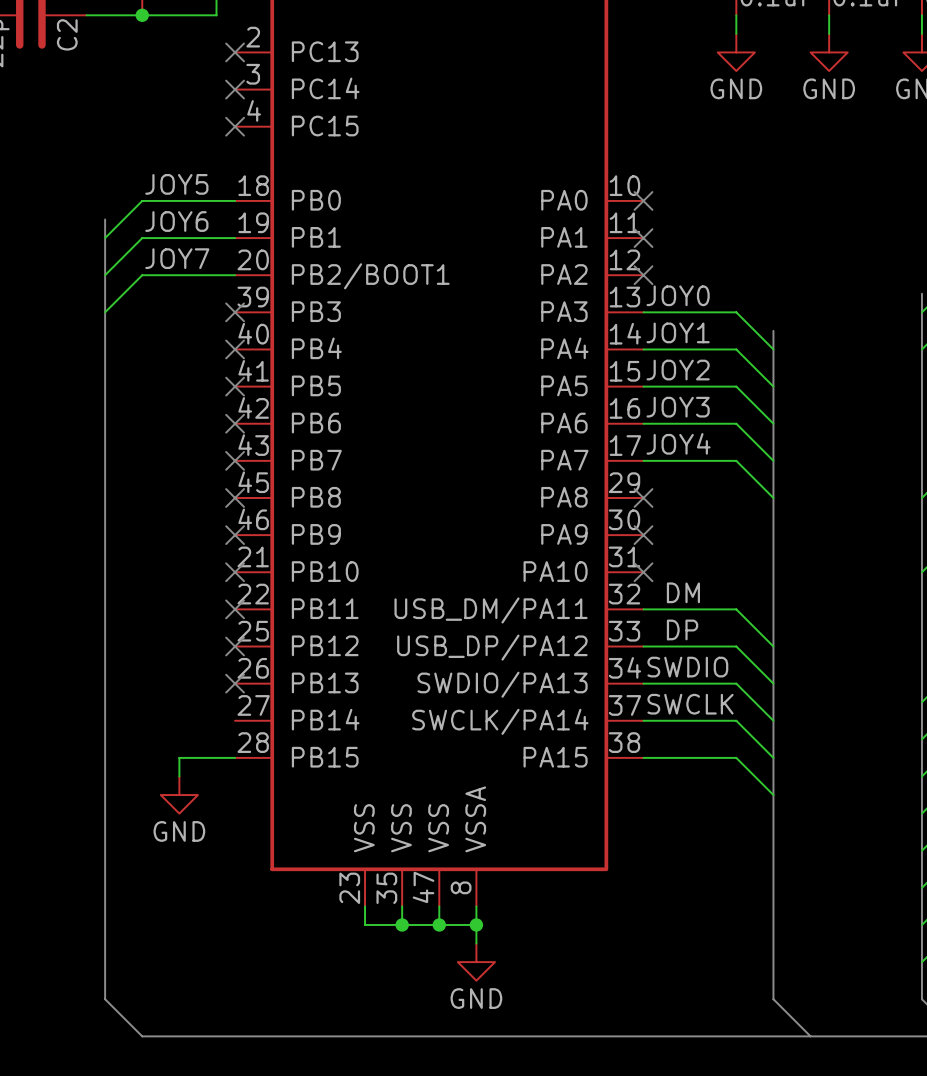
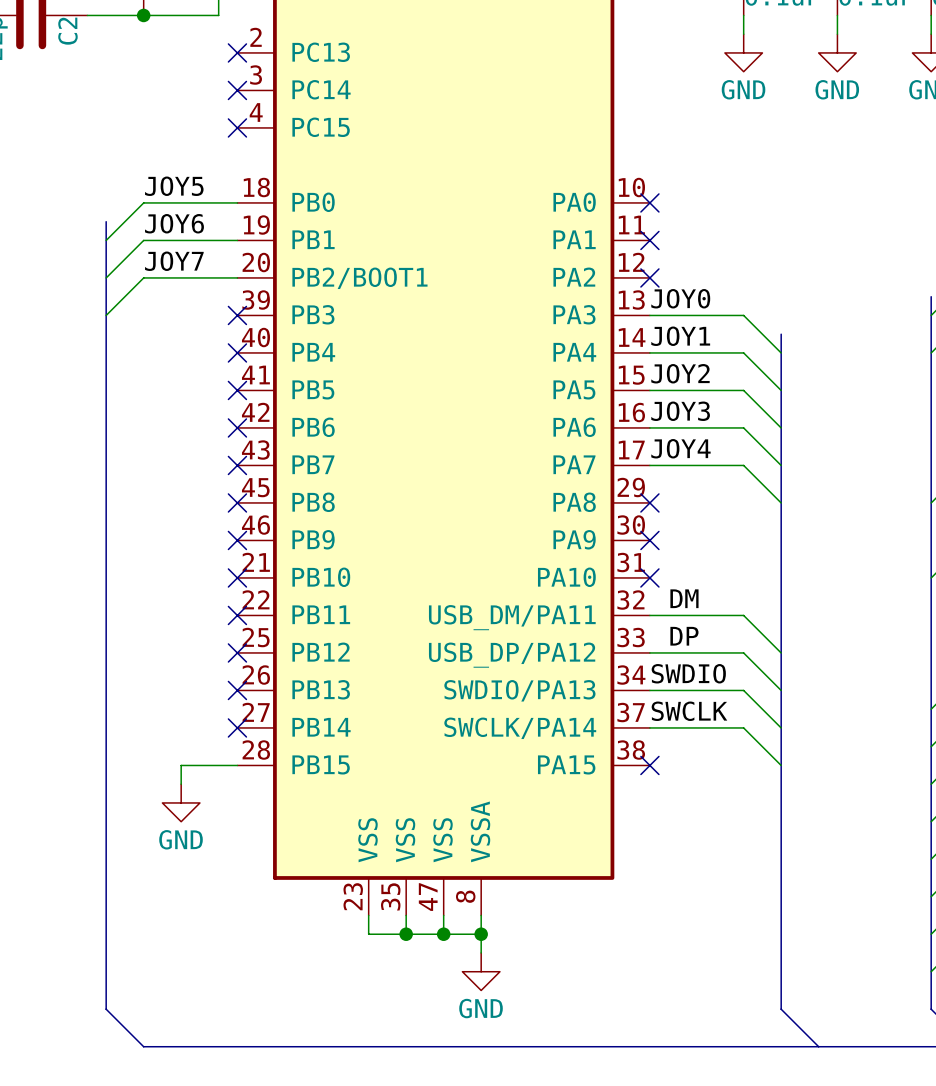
no-connect mark: none -> (237, 727)
wire: (643, 757) (736, 757) (773, 795) -> none
no-connect mark: none -> (649, 765)

